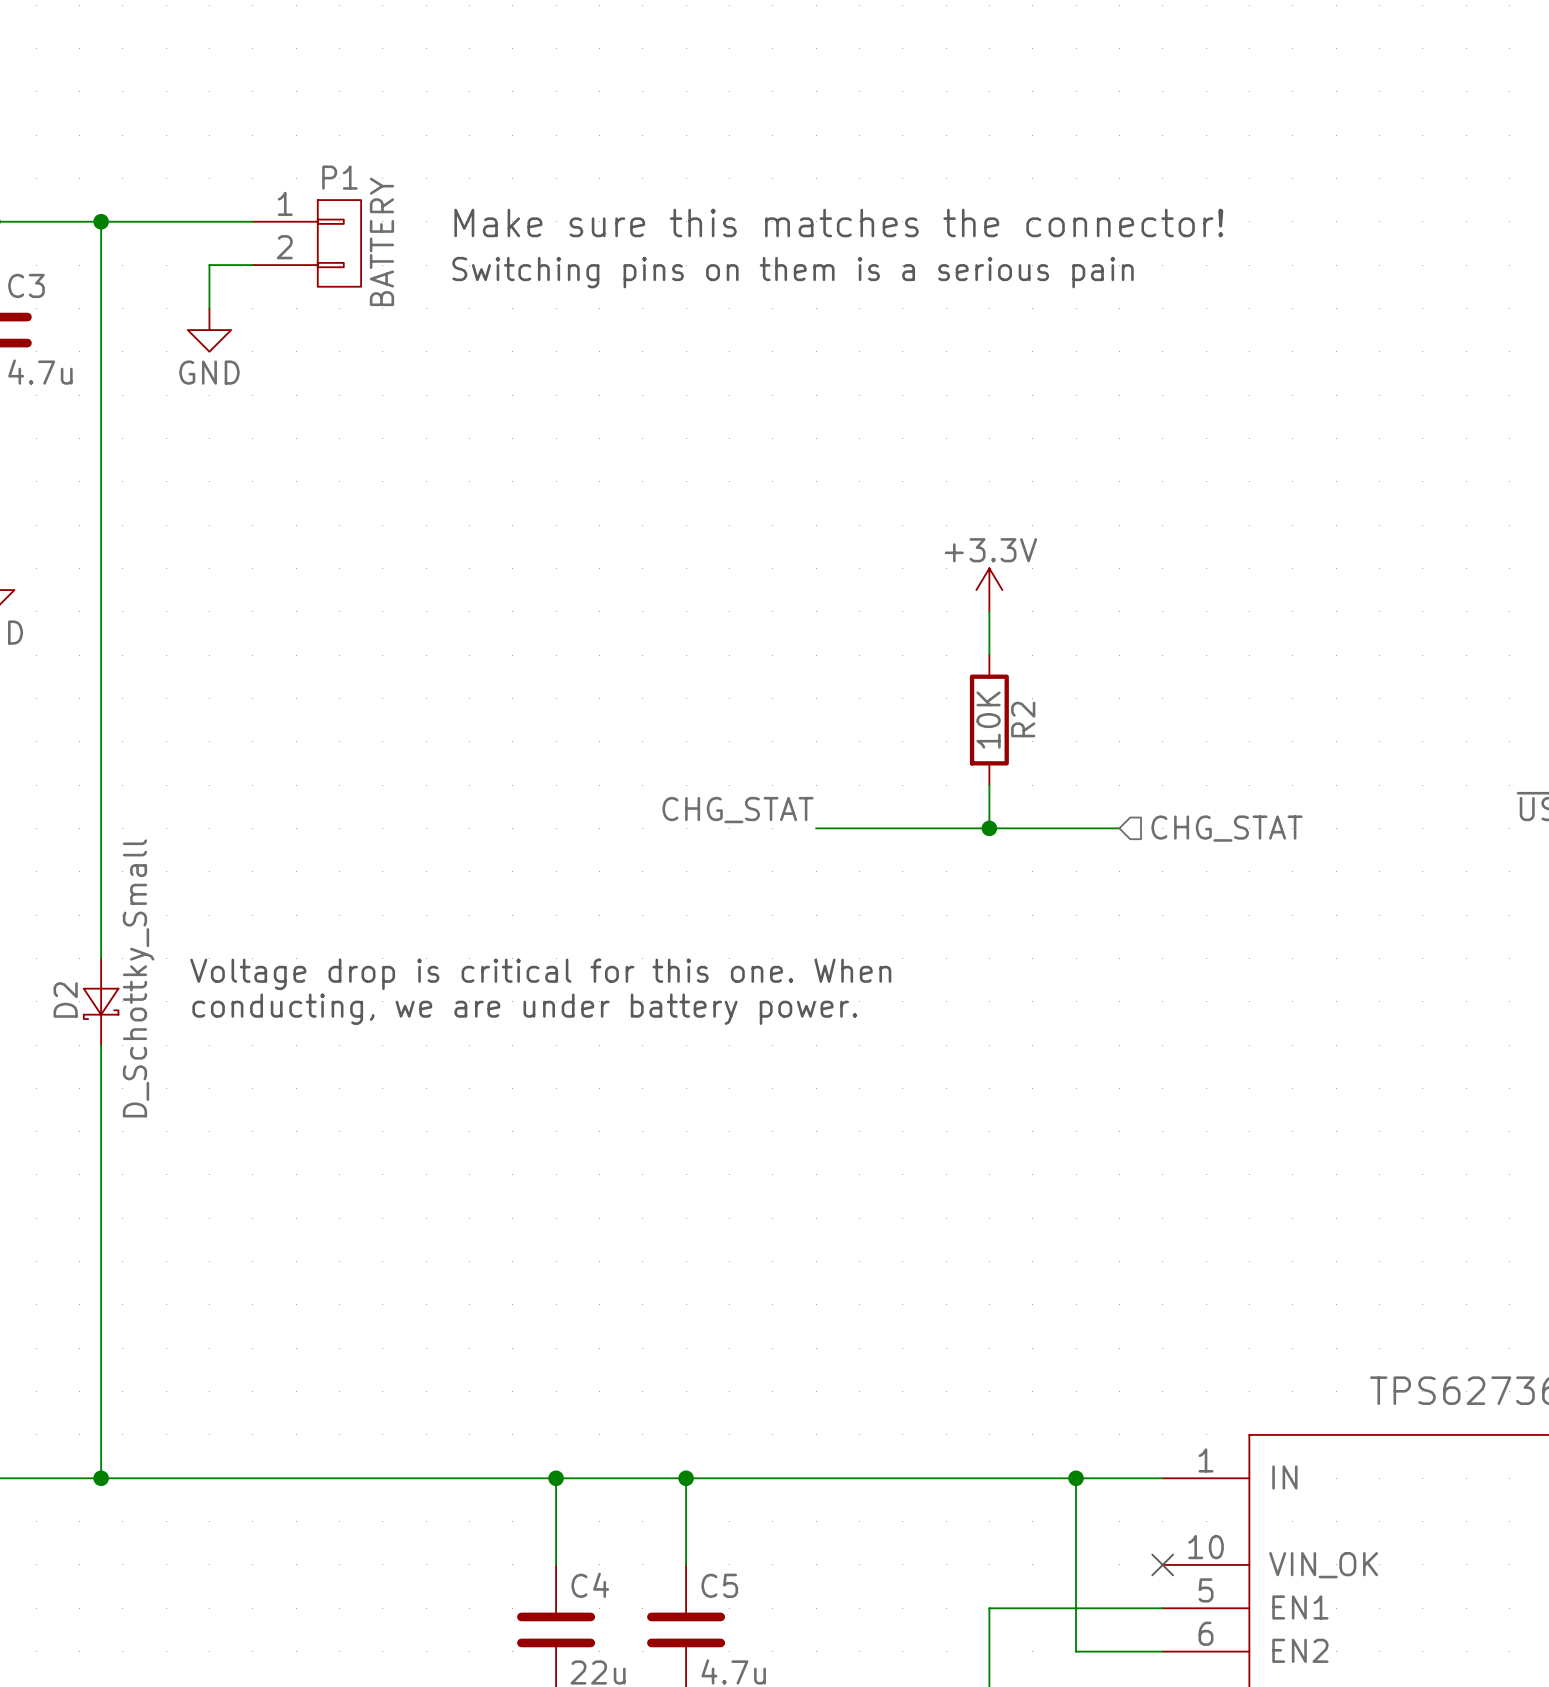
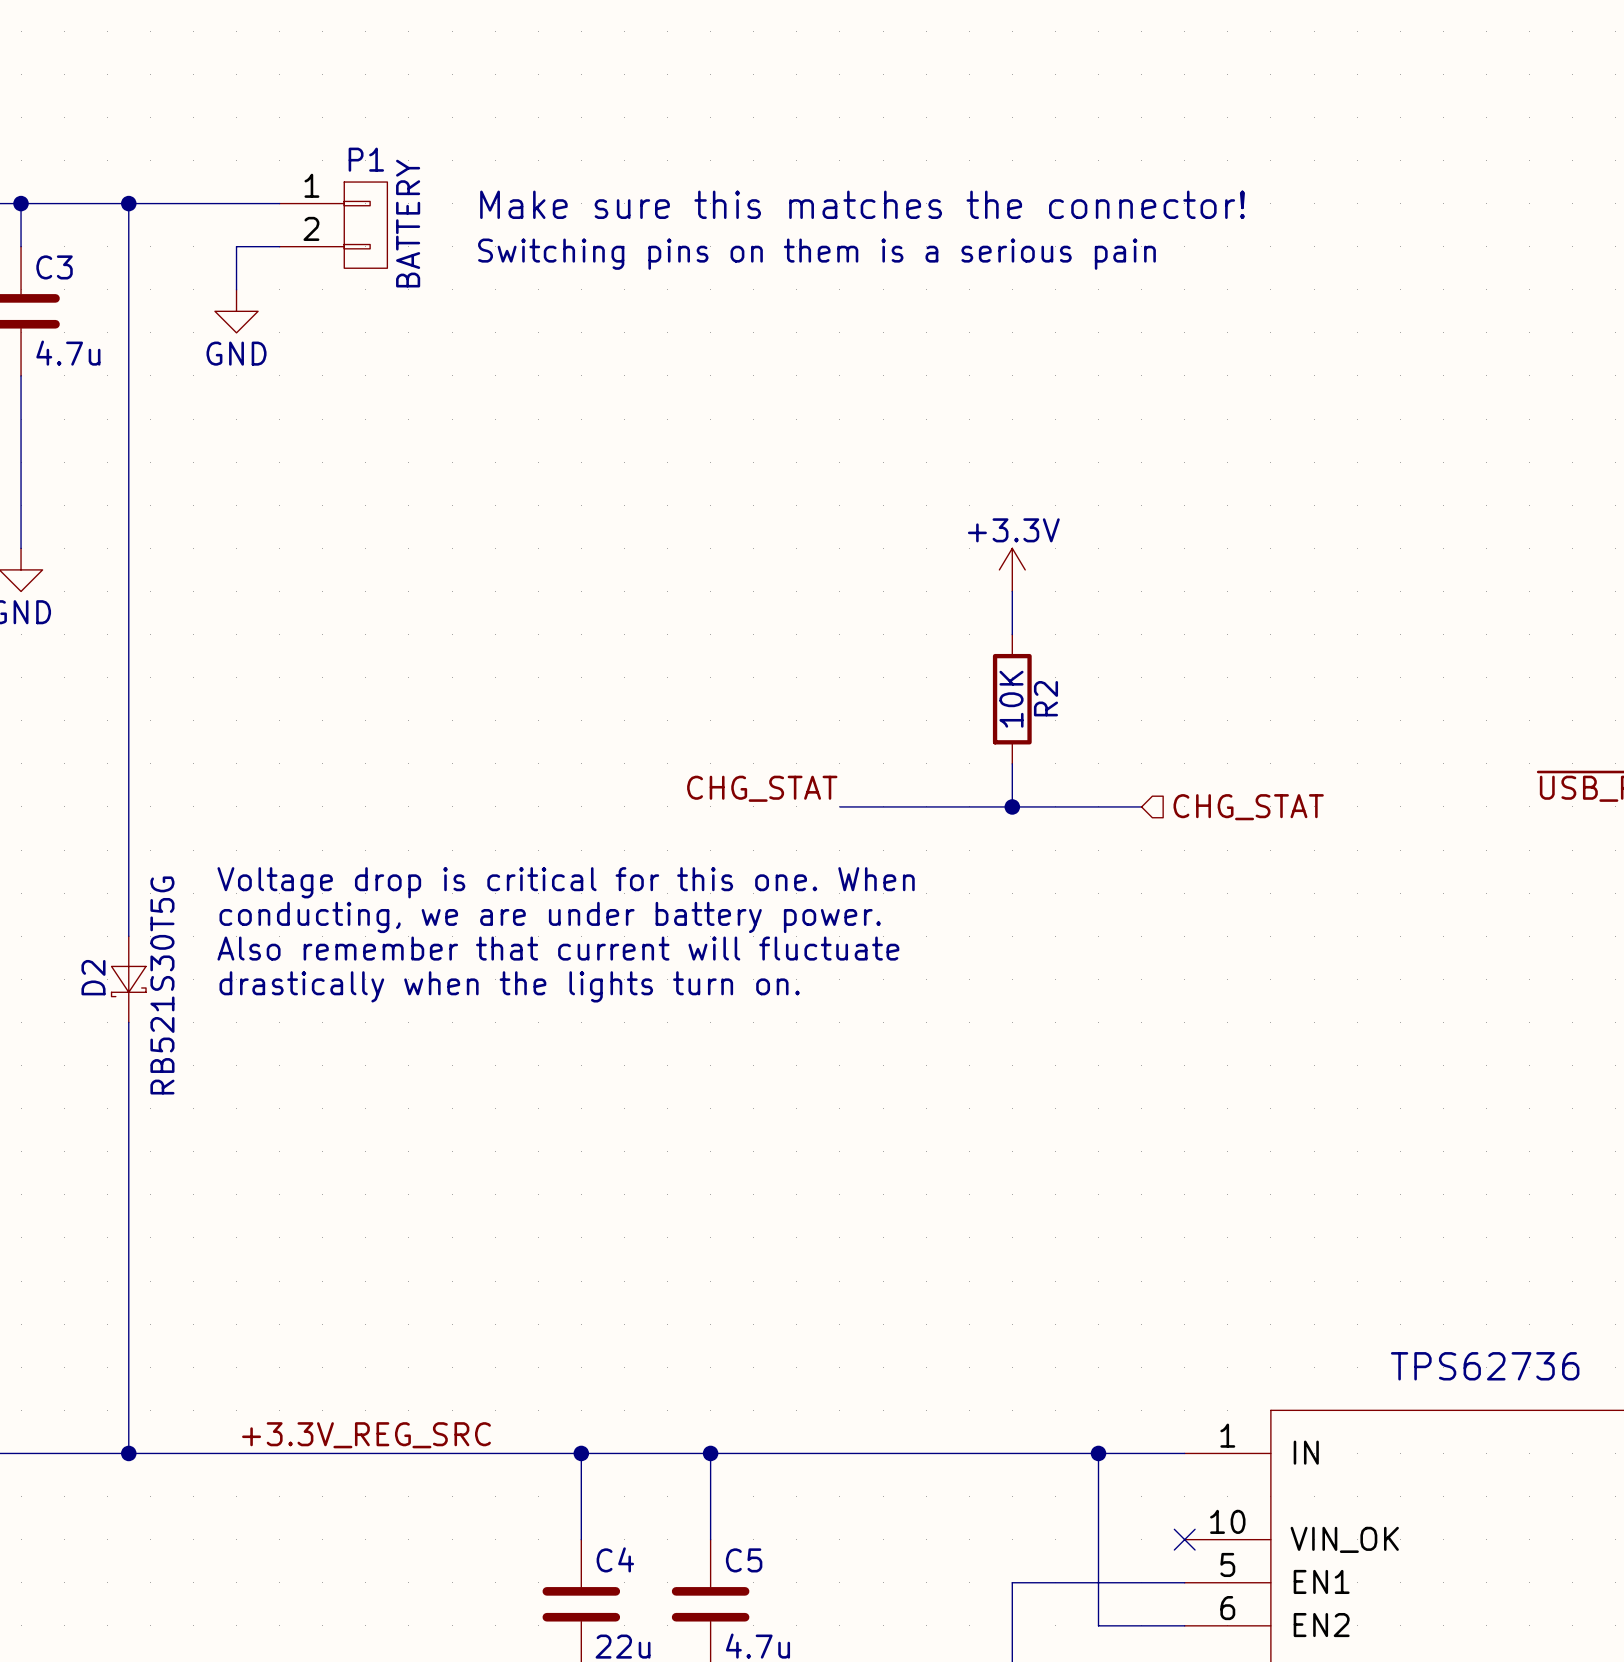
text: none -> Voltage drop is critical for this one. When (566, 882)
text: none -> conducting, we are under battery power. (550, 917)
text: Voltage drop is critical for this one. When (540, 974) -> Also remember that current will fluctuate (558, 948)
D2 value: D_Schottky_Small (138, 978) -> RB521S30T5G (162, 985)
text: conducting, we are under battery power. (524, 1009) -> drastically when the lights turn on. (509, 986)
label: none -> +3.3V_REG_SRC (366, 1435)

